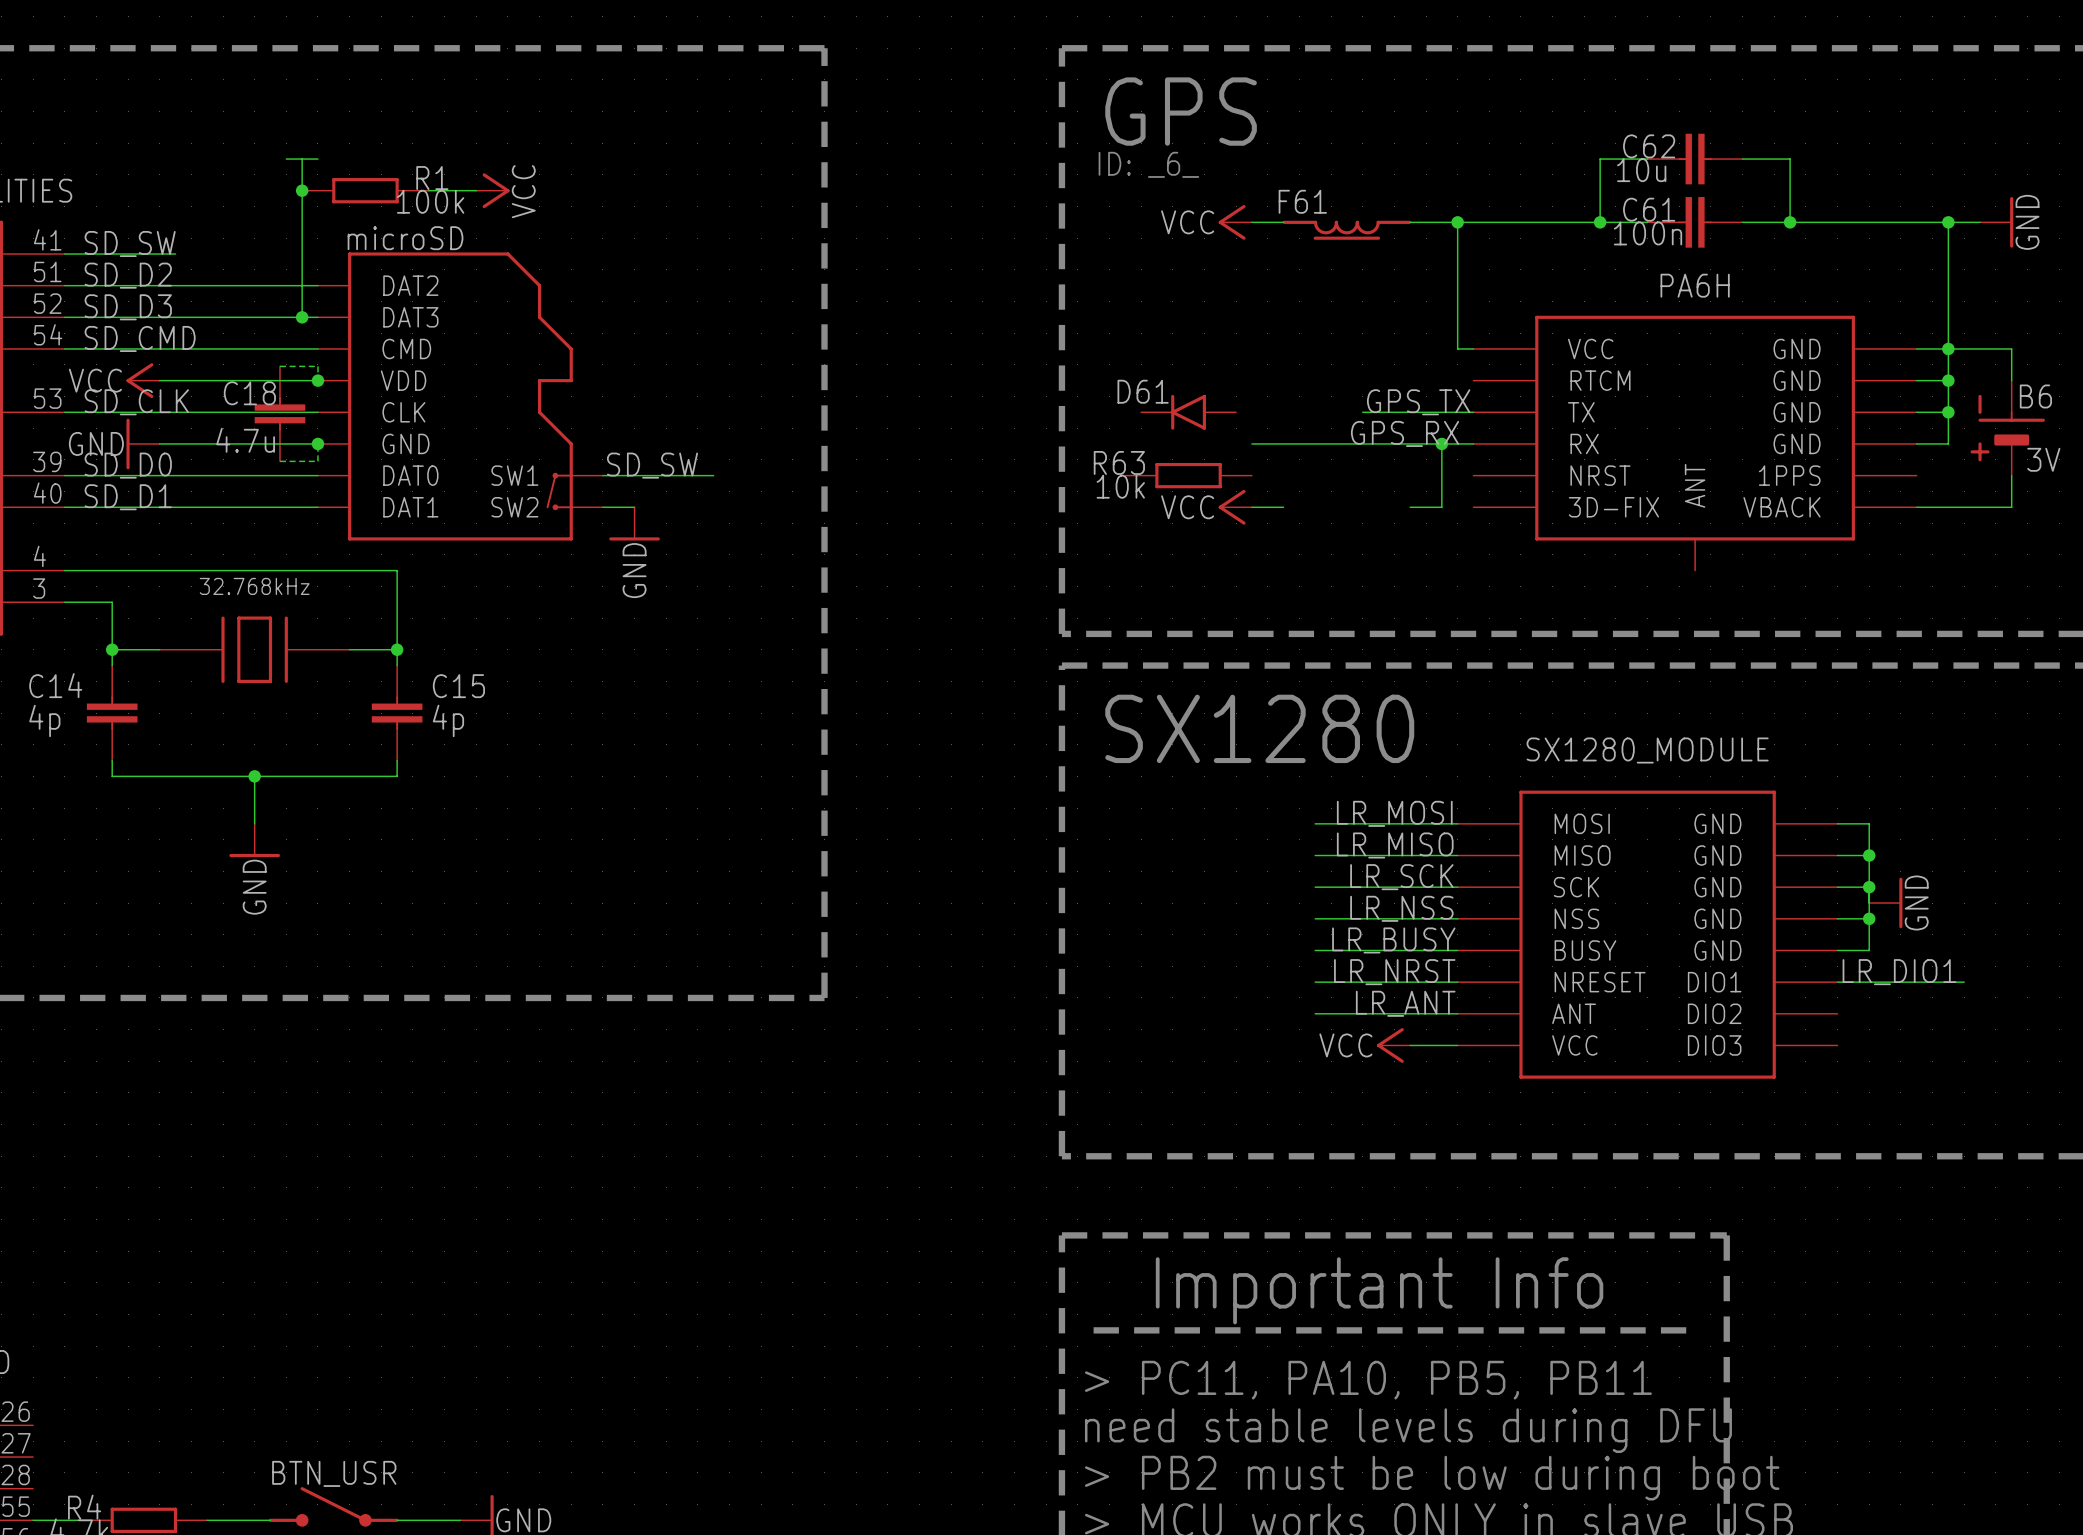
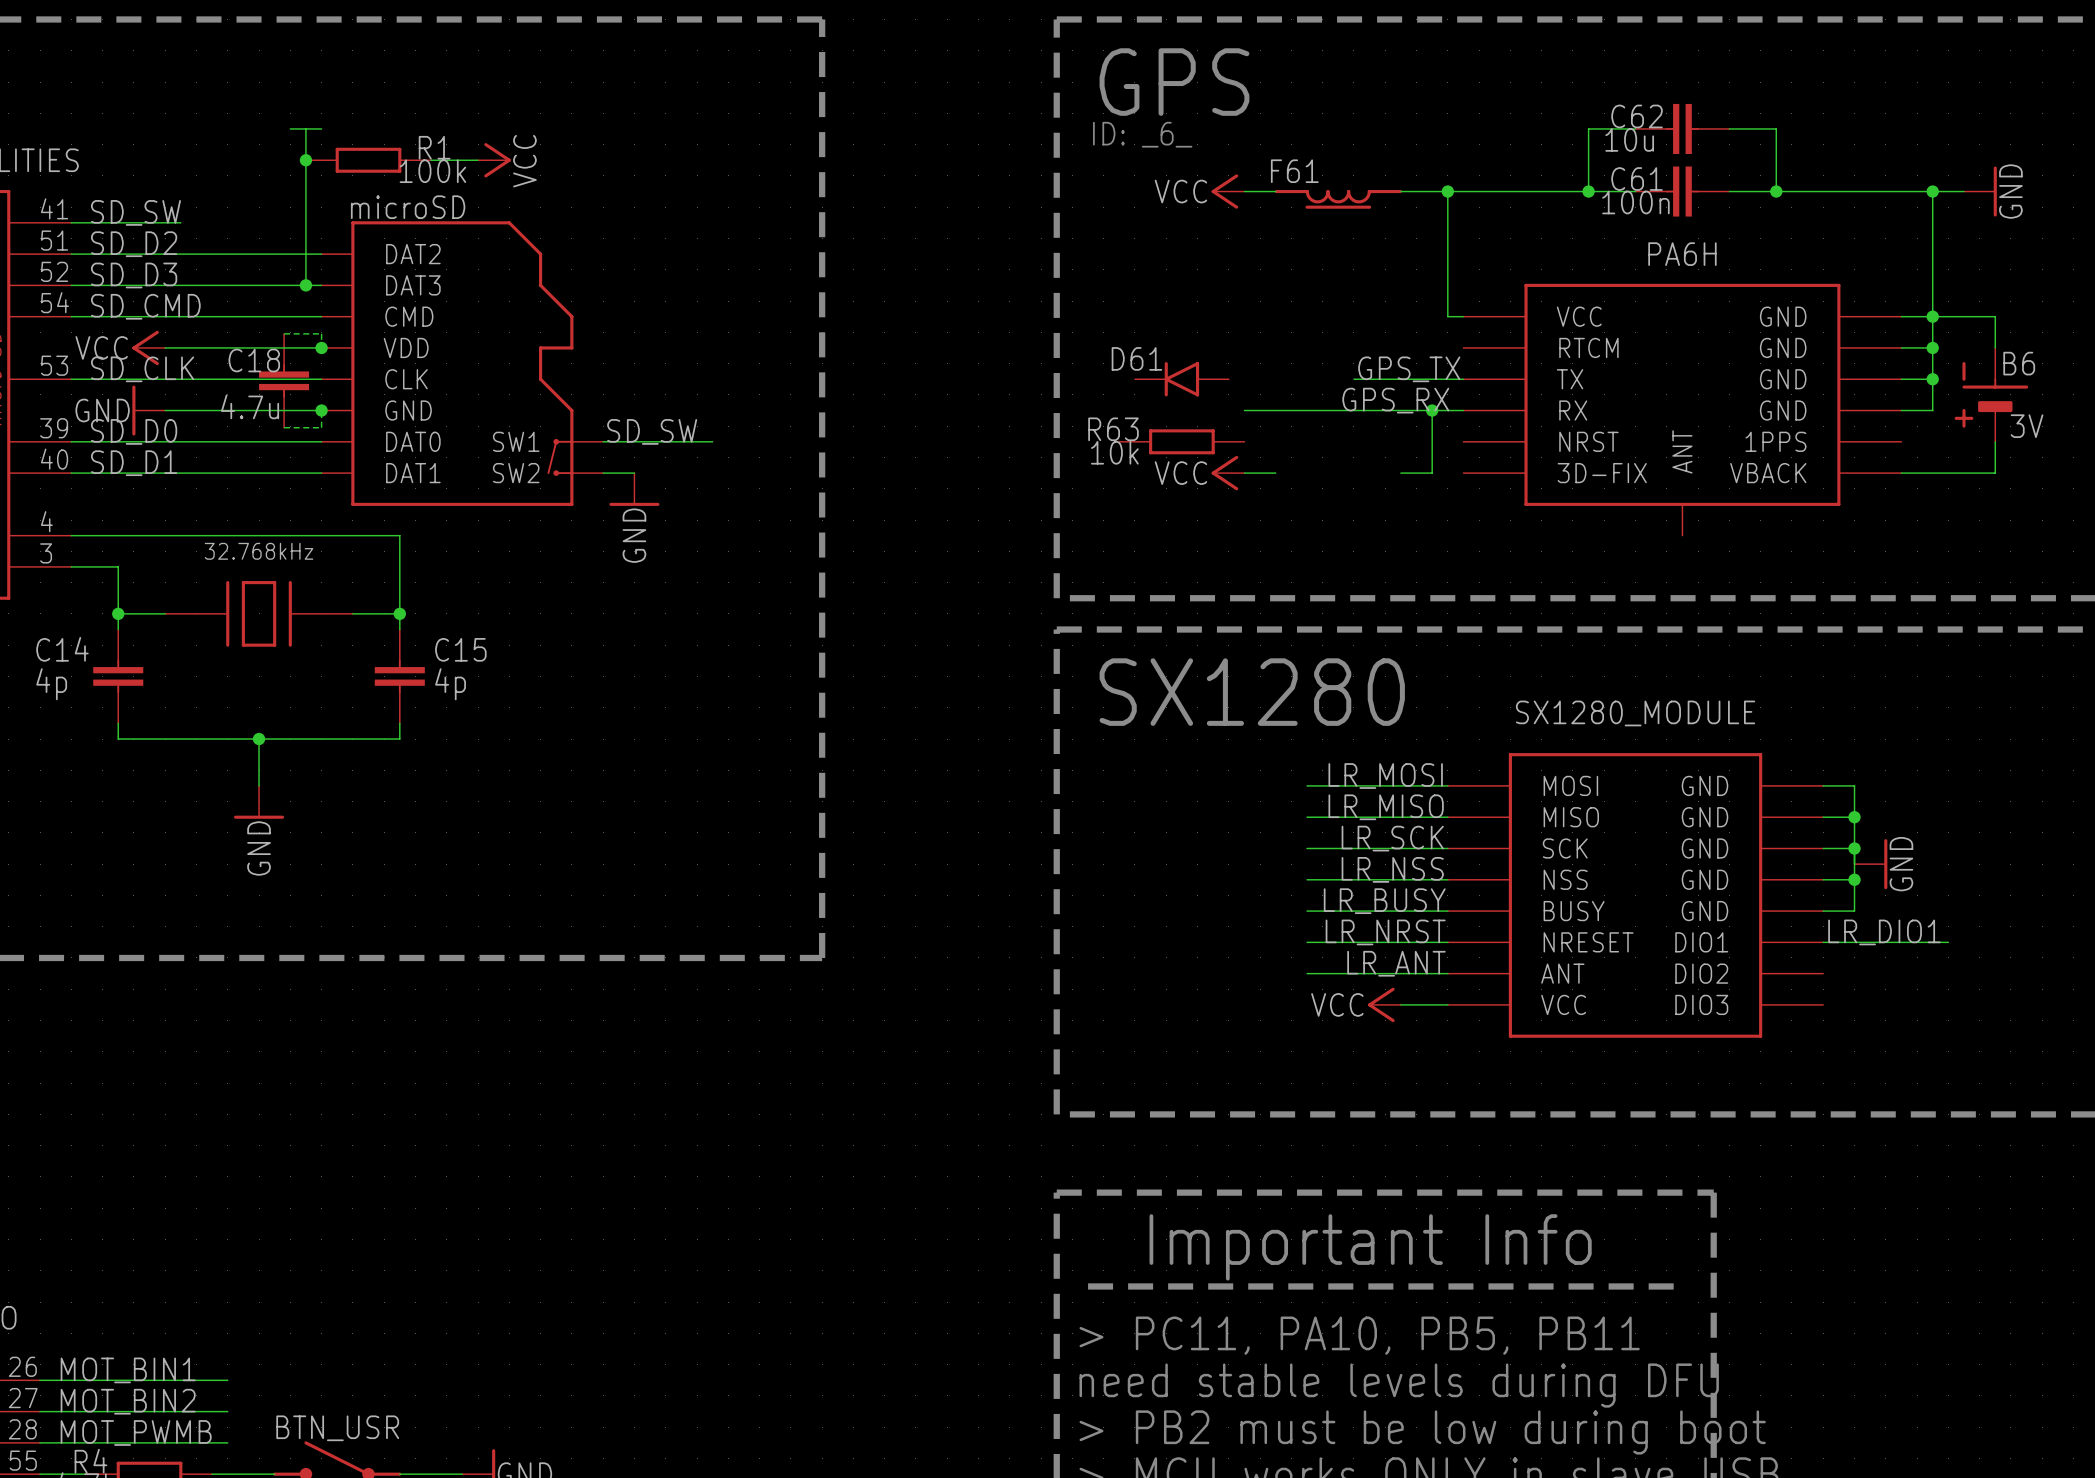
label: none -> MOT_BIN1 (128, 1370)
wire: none -> (40, 1380) (227, 1380)
label: none -> MOT_BIN2 (128, 1401)
wire: none -> (40, 1411) (227, 1411)
label: none -> MOT_PWMB (136, 1432)
wire: none -> (40, 1442) (227, 1442)

